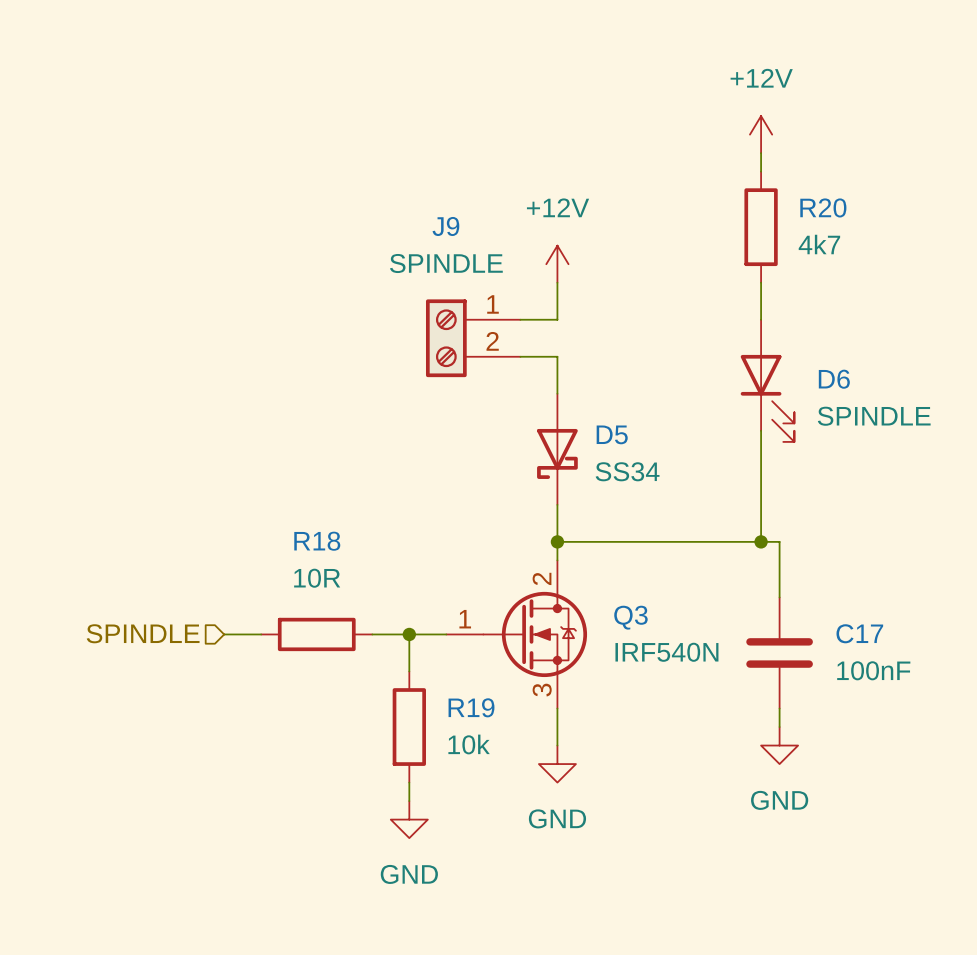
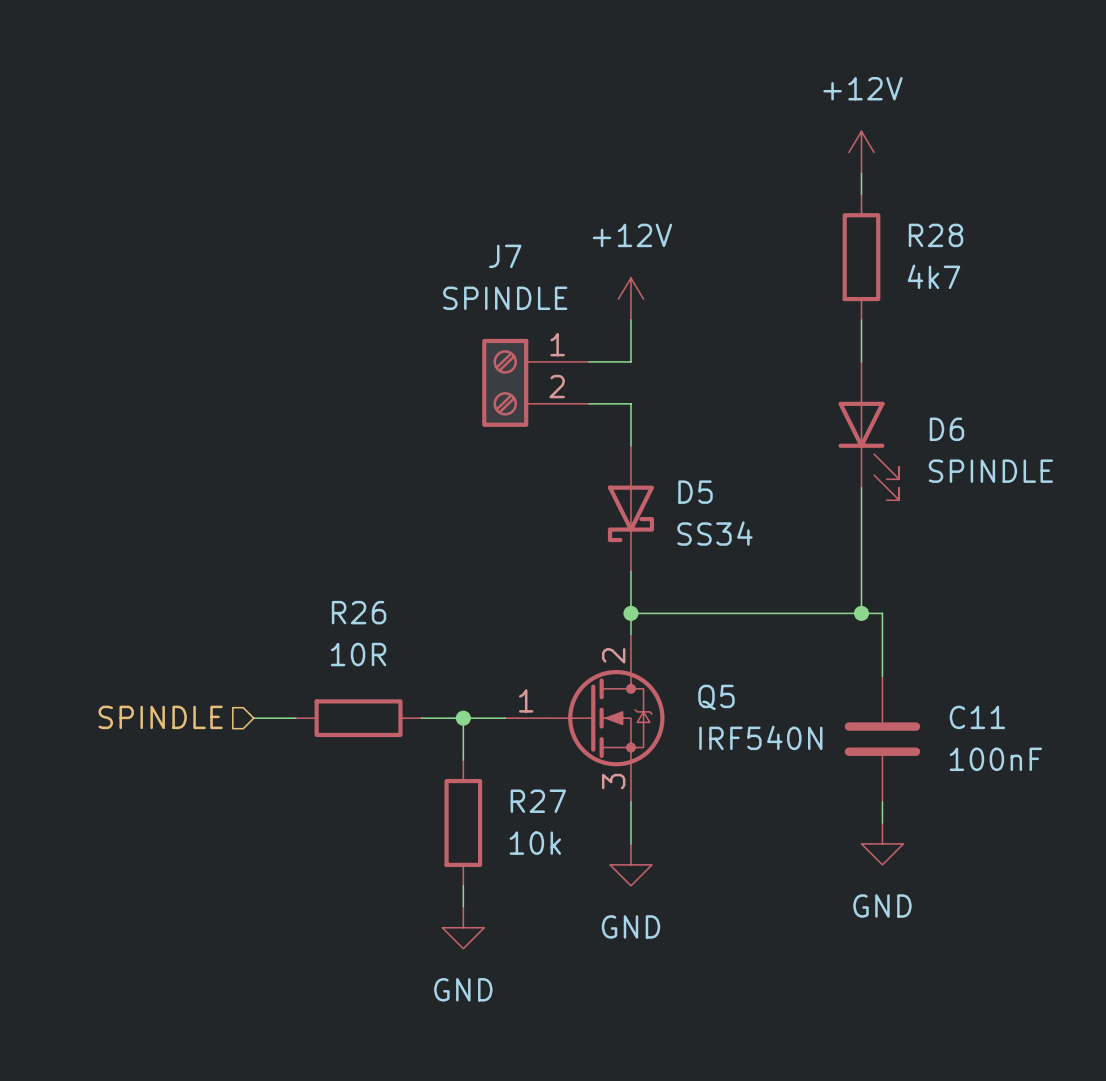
R20 name: R20 (823, 207) -> R28 (935, 235)
J9 name: J9 (445, 226) -> J7 (505, 256)
R18 name: R18 (317, 541) -> R26 (359, 612)
Q3 name: Q3 (630, 617) -> Q5 (716, 697)
C17 name: C17 (859, 633) -> C11 (977, 717)
R19 name: R19 (471, 707) -> R27 (538, 801)

